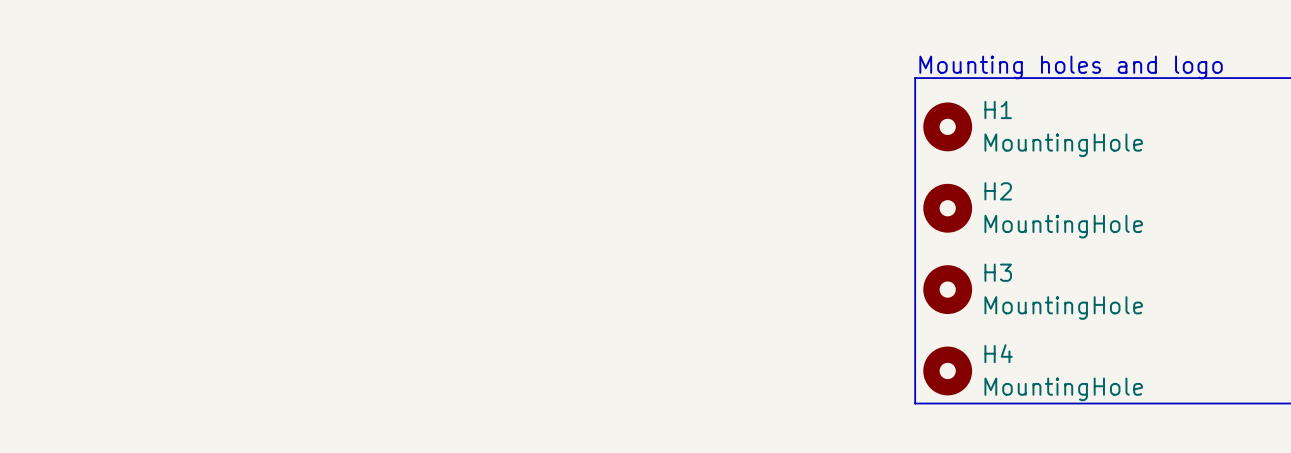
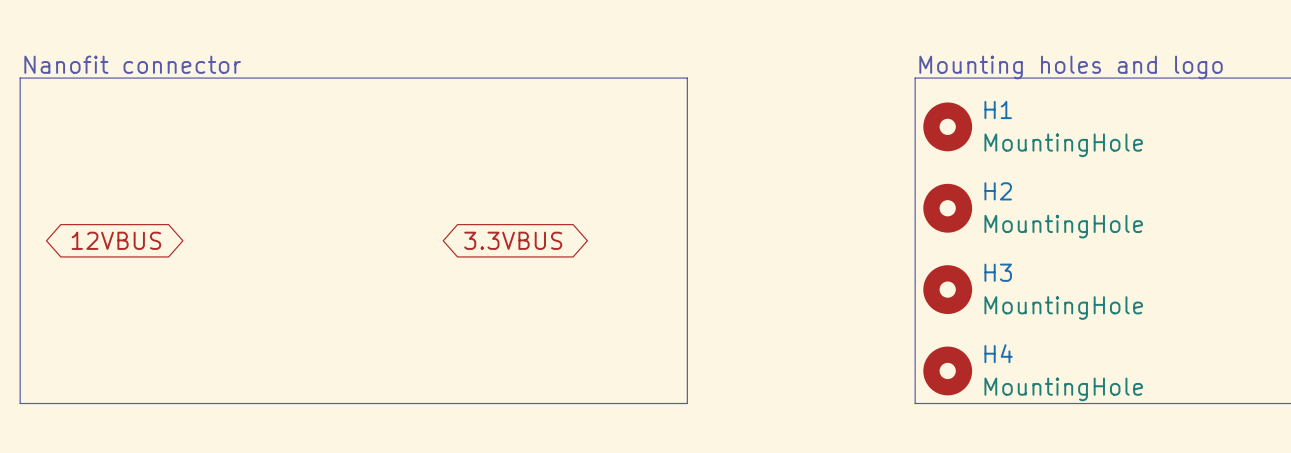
text: none -> Nanofit connector (132, 64)
line: none -> (20, 78) (687, 78) (687, 403) (20, 403) (20, 78)
global label: none -> 12VBUS (116, 240)
global label: none -> 3.3VBUS (513, 240)

